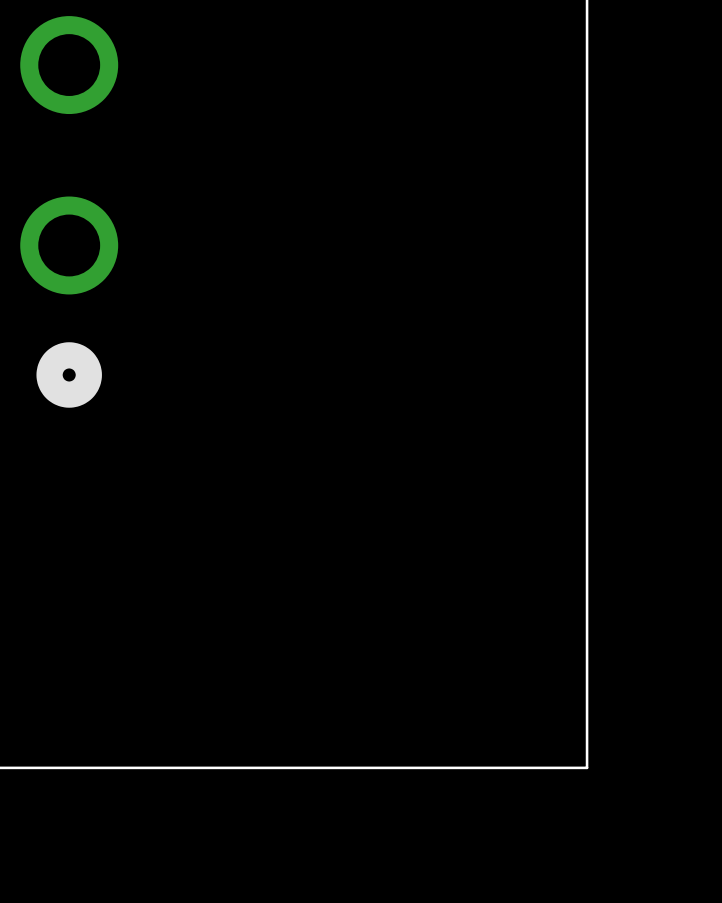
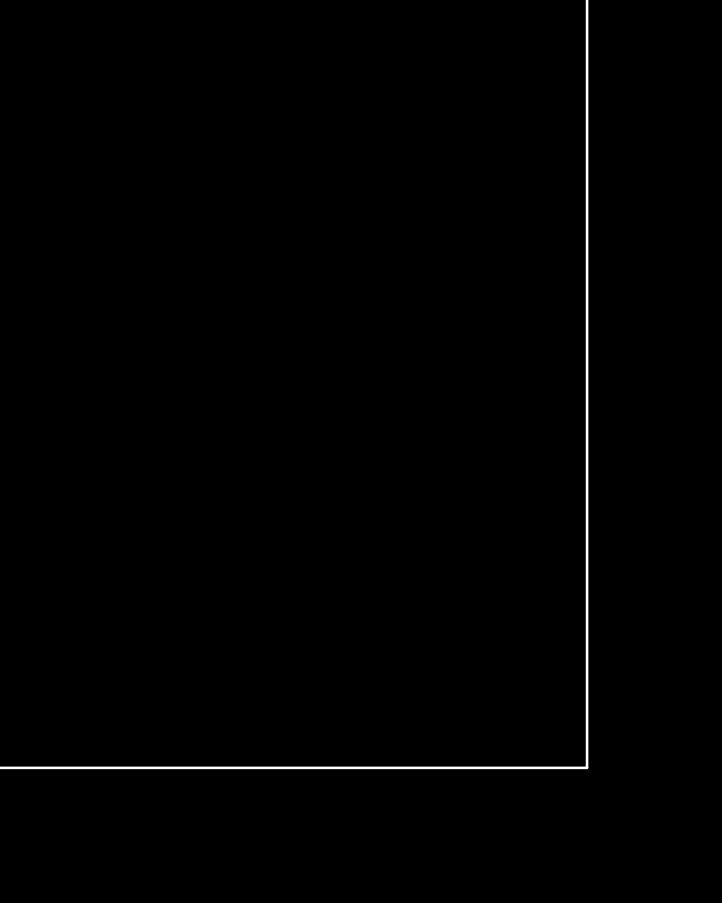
part: (69, 211) -> none

